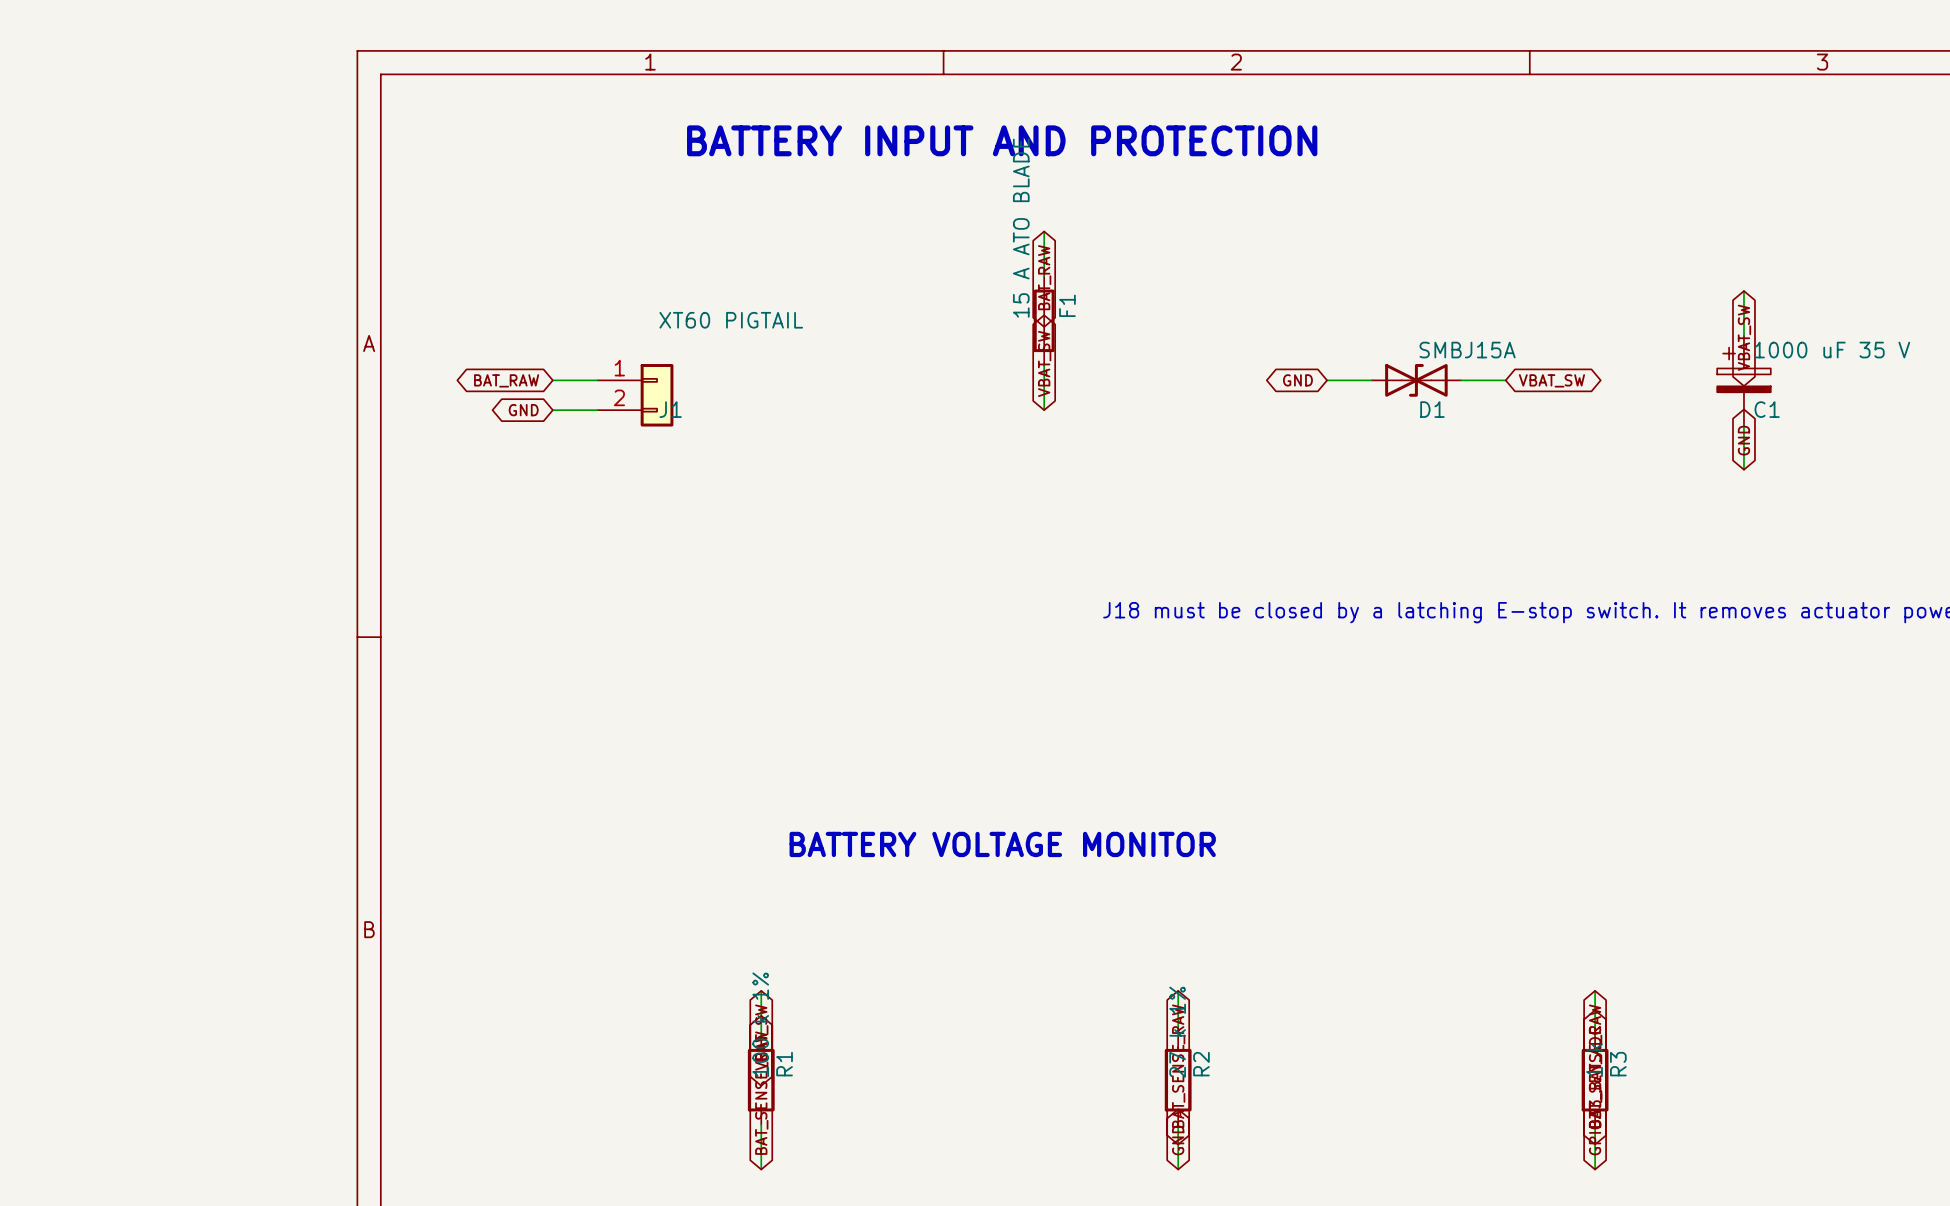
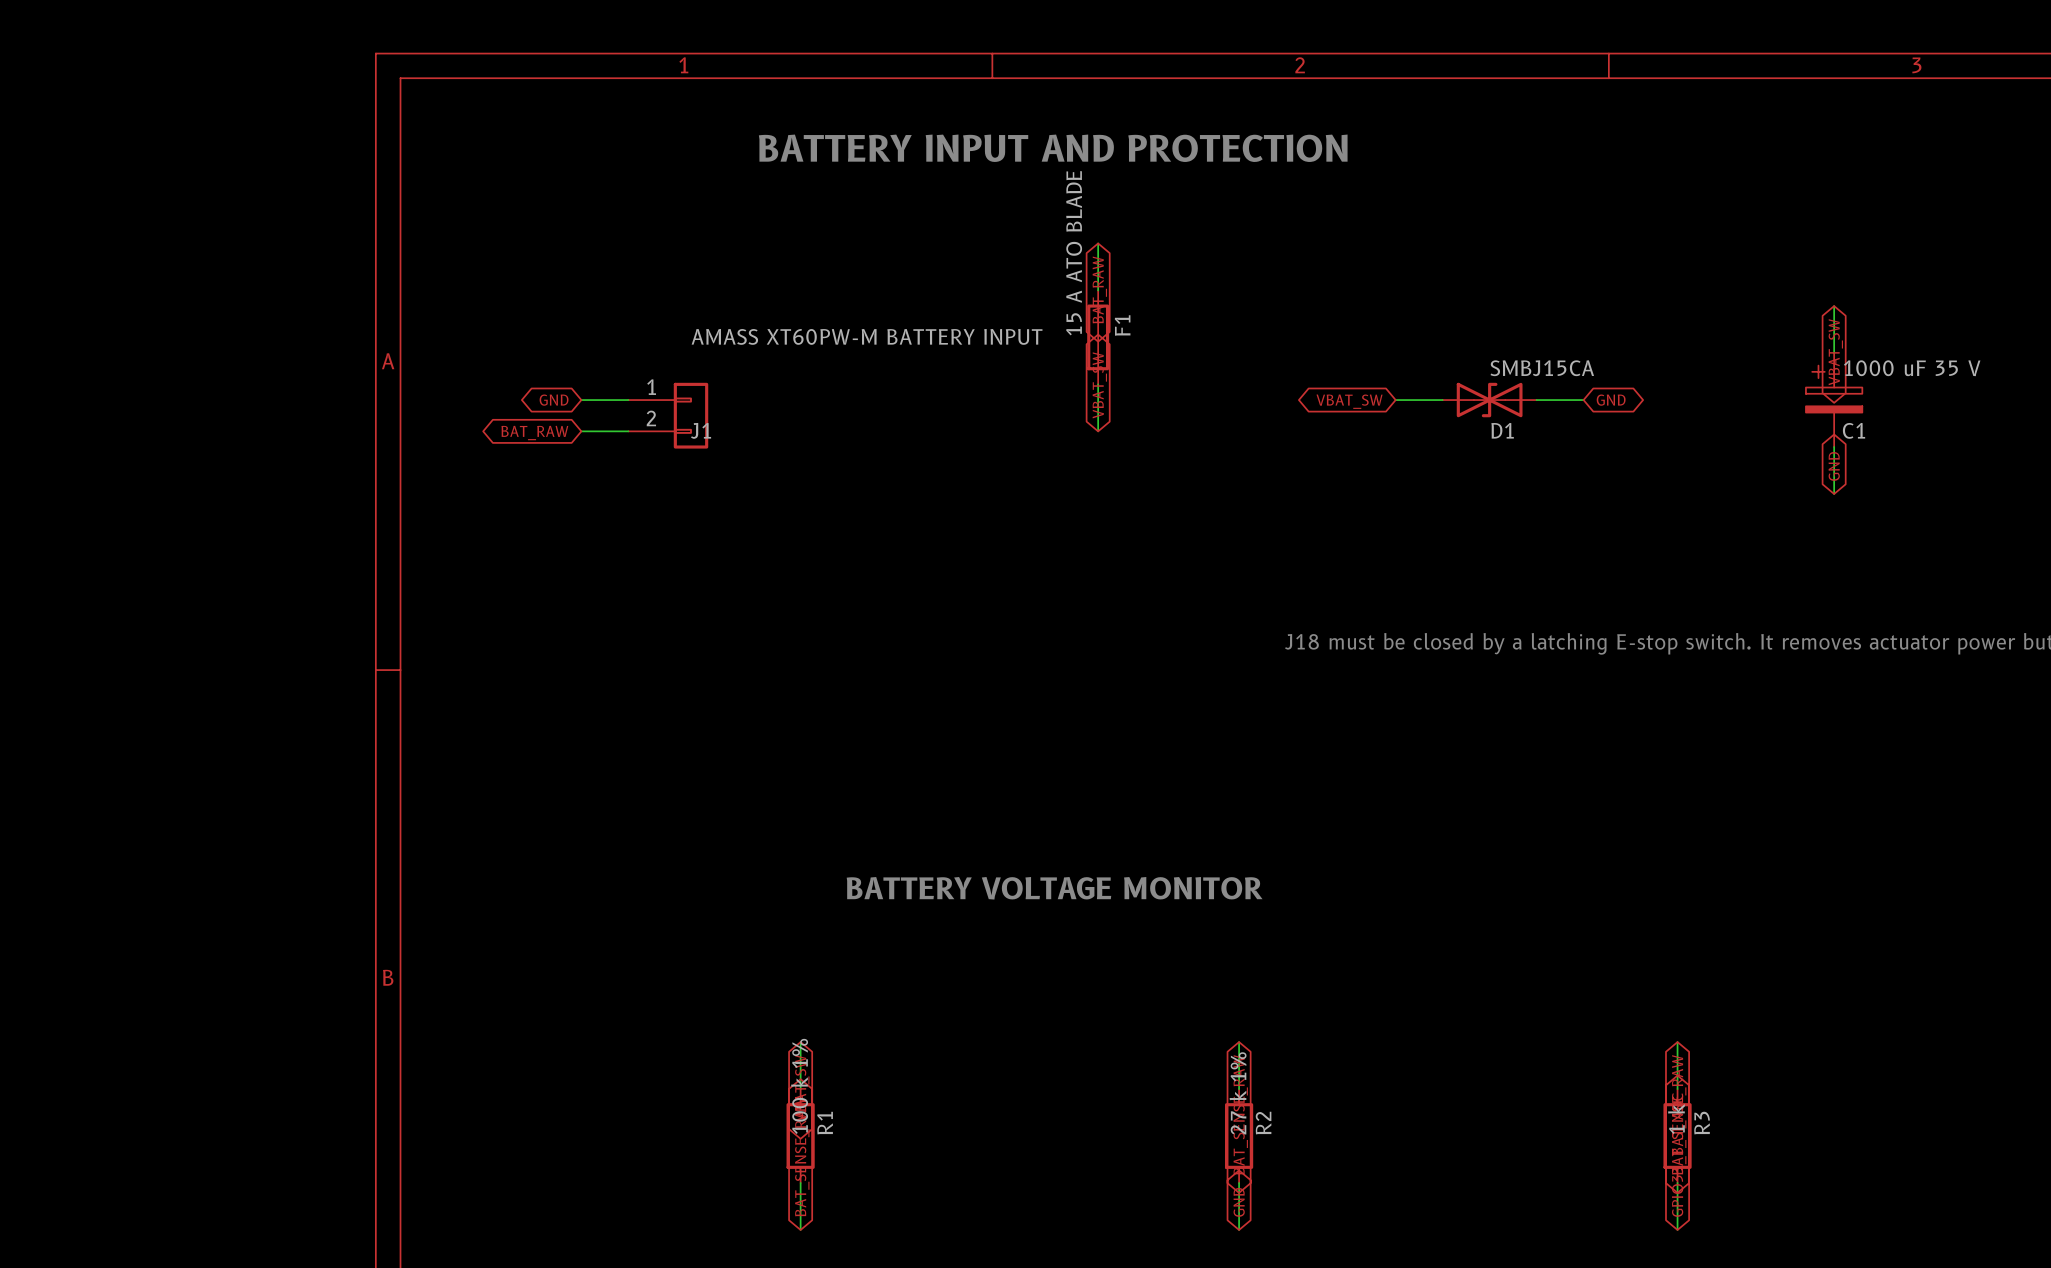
J1 value: XT60 PIGTAIL (731, 320) -> AMASS XT60PW-M BATTERY INPUT (867, 336)
D1 value: SMBJ15A (1467, 350) -> SMBJ15CA (1542, 368)
global label: BAT_RAW (506, 380) -> GND (554, 400)
global label: GND (1297, 380) -> VBAT_SW (1349, 401)
global label: VBAT_SW (1551, 380) -> GND (1611, 400)
global label: GND (523, 410) -> BAT_RAW (534, 433)

